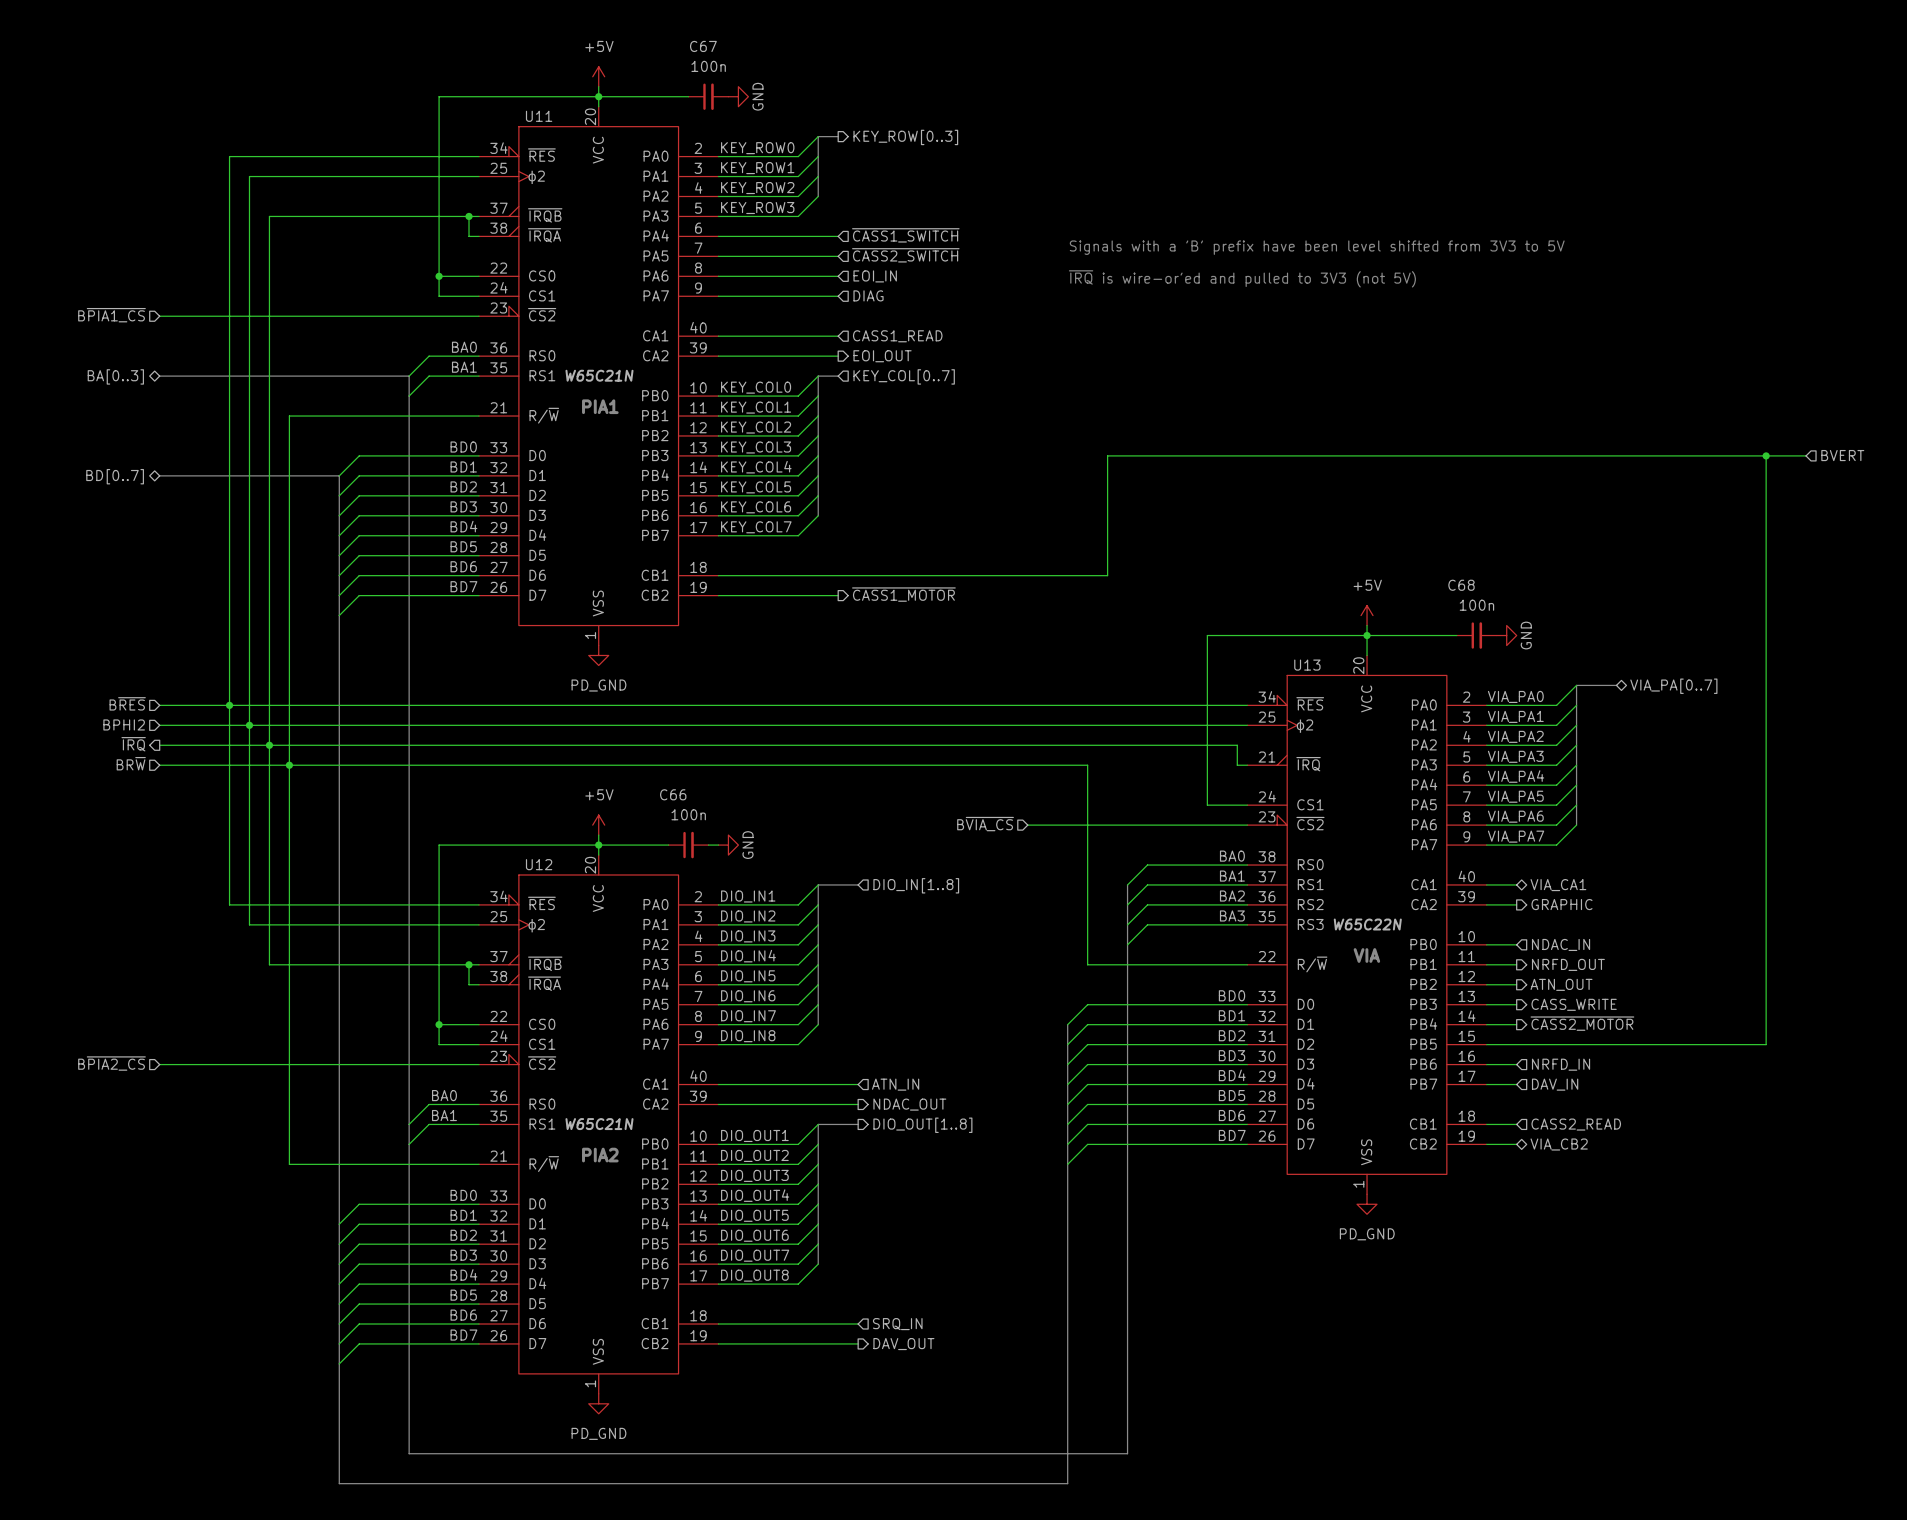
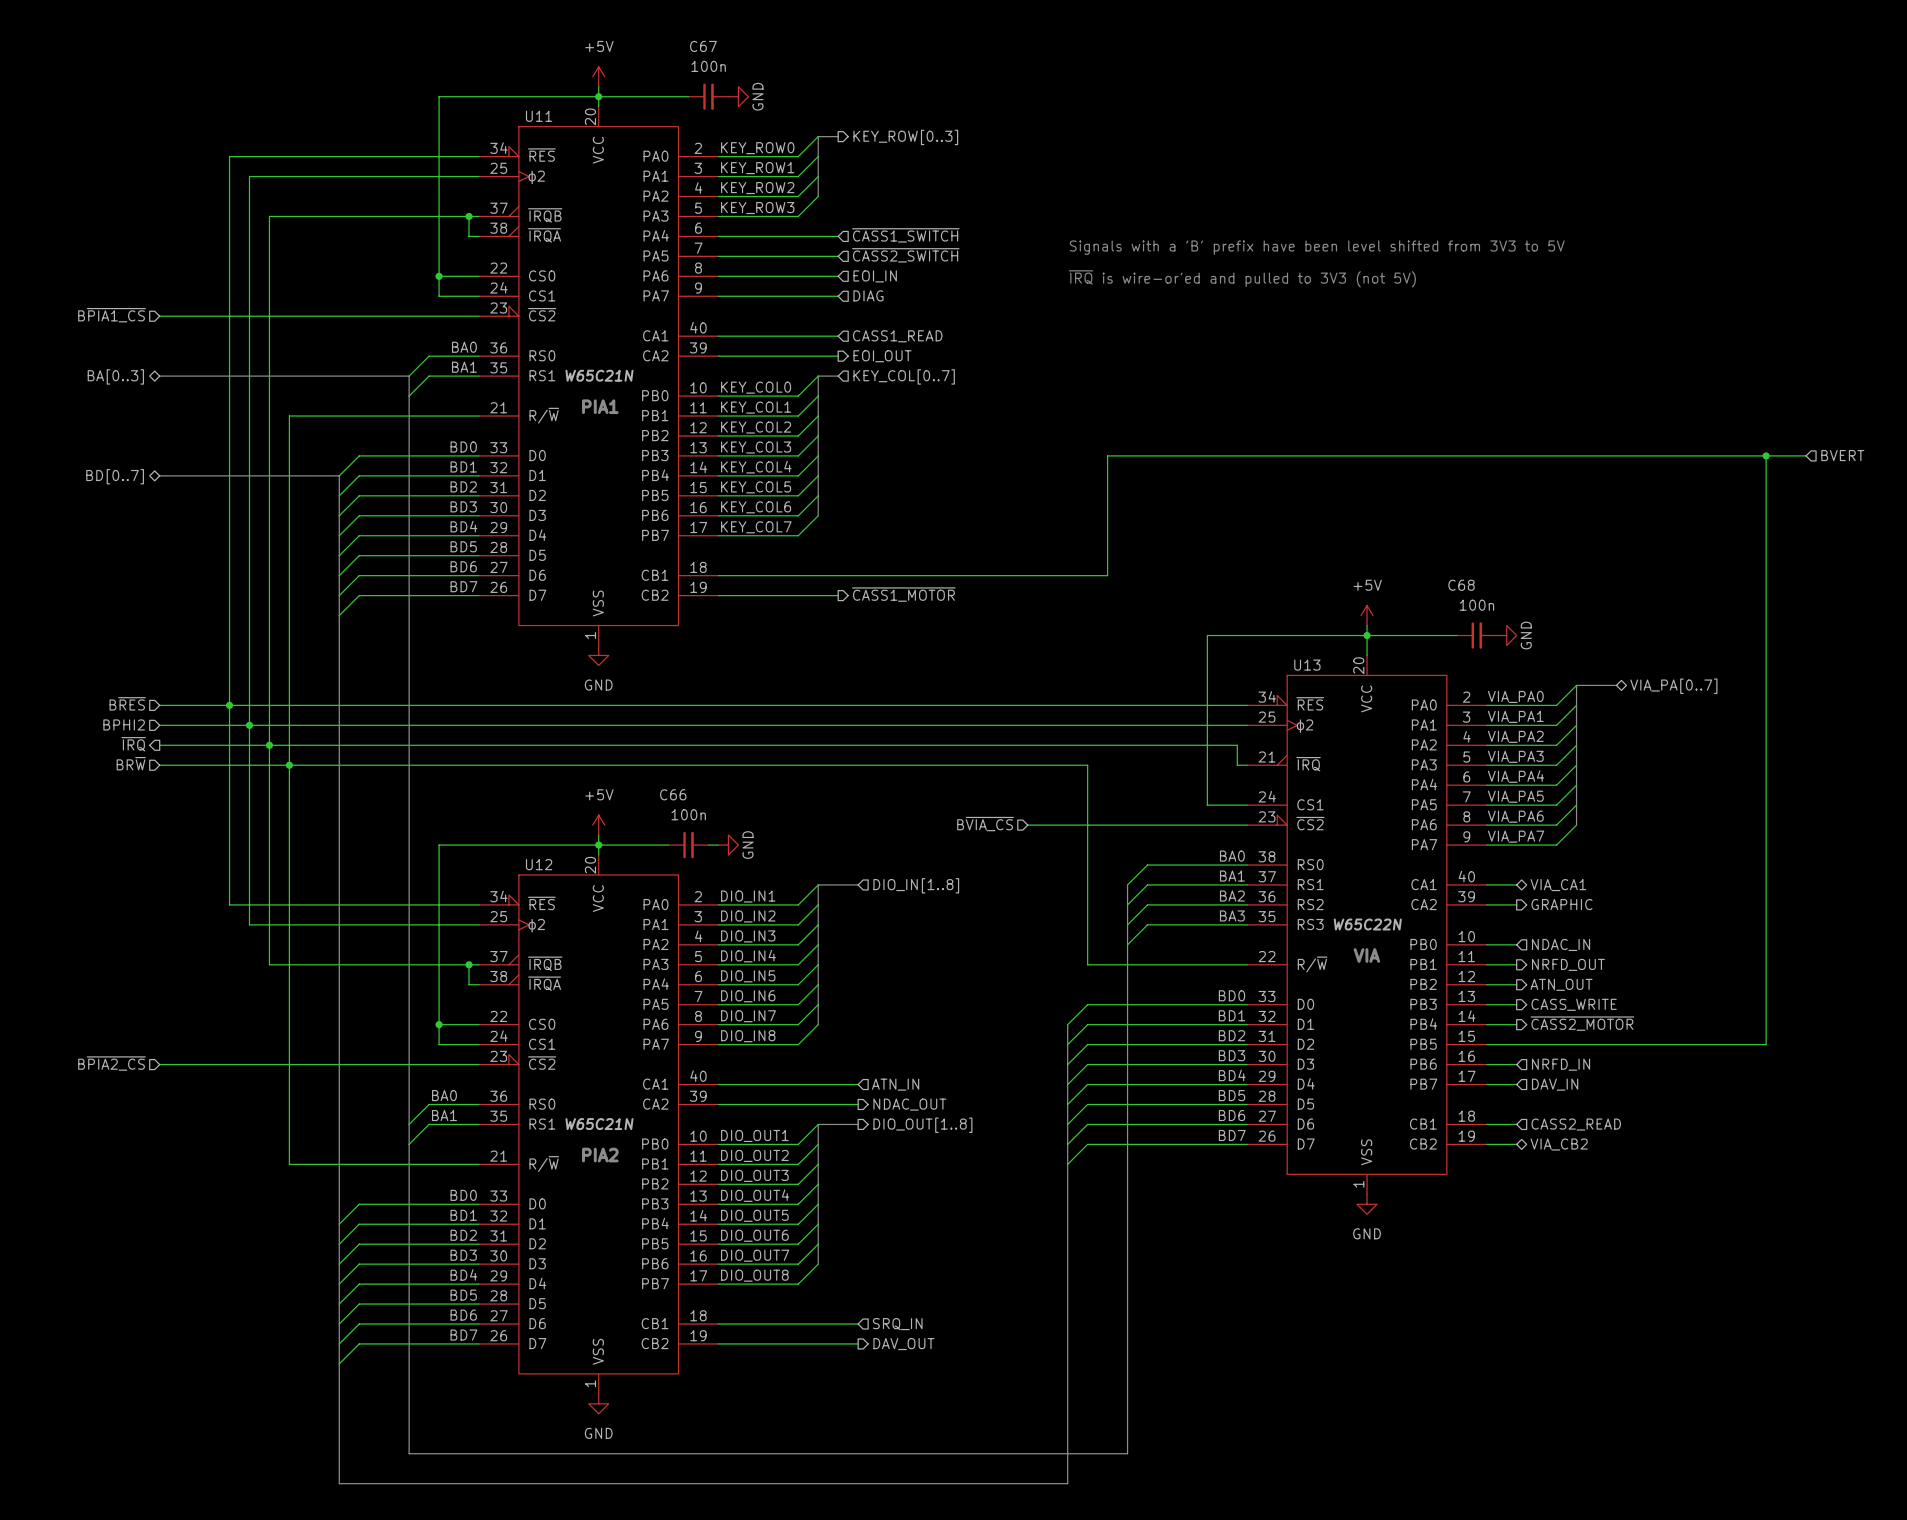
power symbol: PD_GND (598, 655) -> GND (598, 655)
power symbol: PD_GND (1367, 1204) -> GND (1367, 1204)
power symbol: PD_GND (598, 1403) -> GND (598, 1403)

